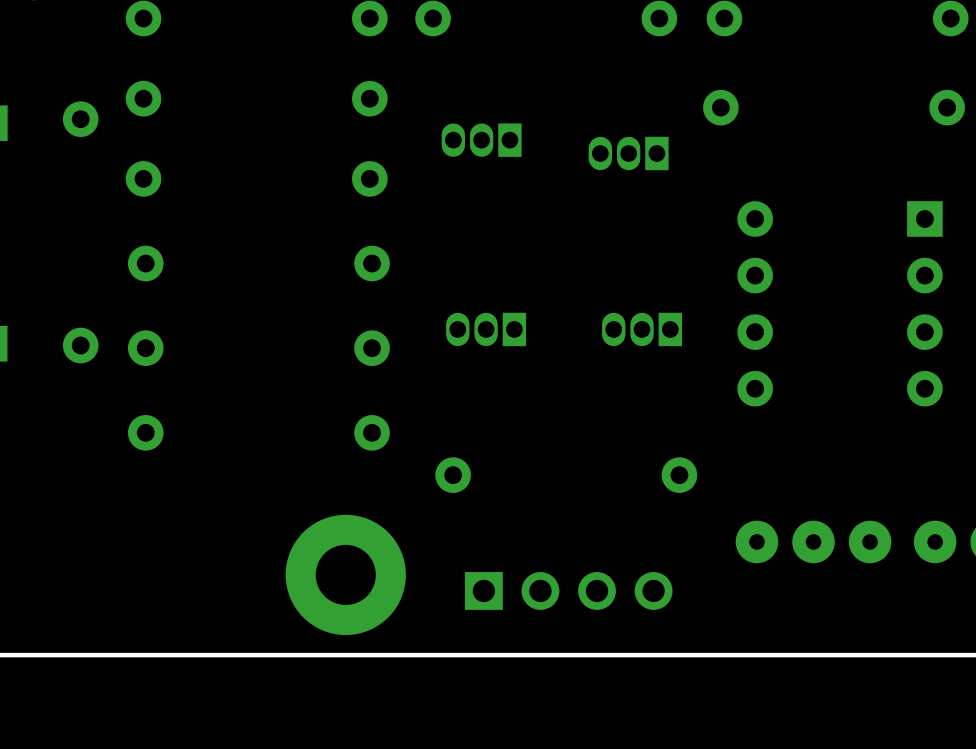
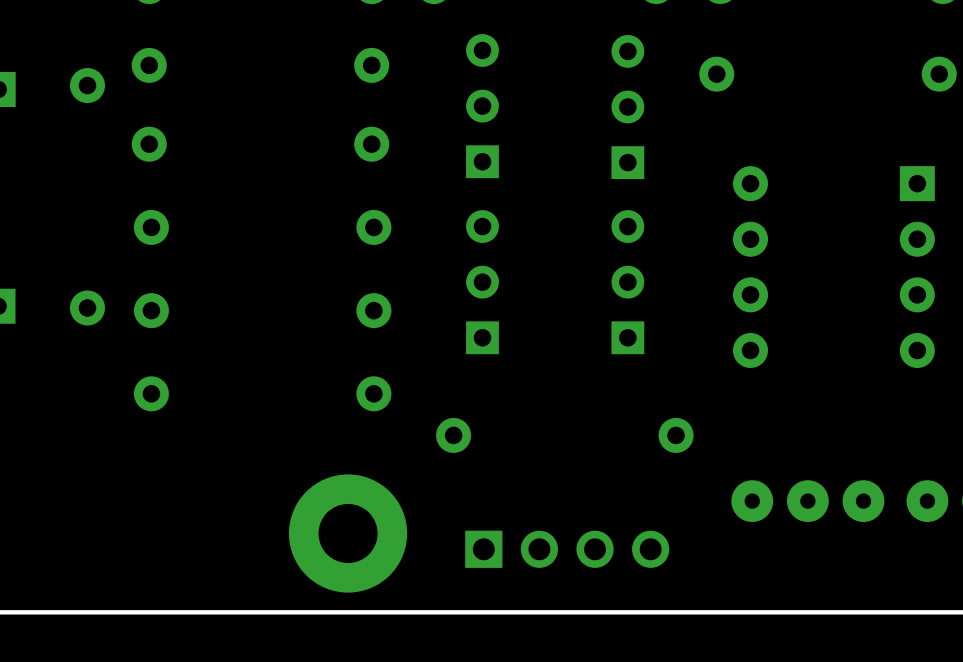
part footprint: [441, 123, 522, 157] -> [466, 34, 499, 179]
part footprint: [588, 136, 669, 171] -> [611, 34, 645, 180]
part footprint: [446, 312, 527, 347] -> [466, 210, 499, 355]
part footprint: [602, 312, 682, 347] -> [611, 210, 645, 355]

